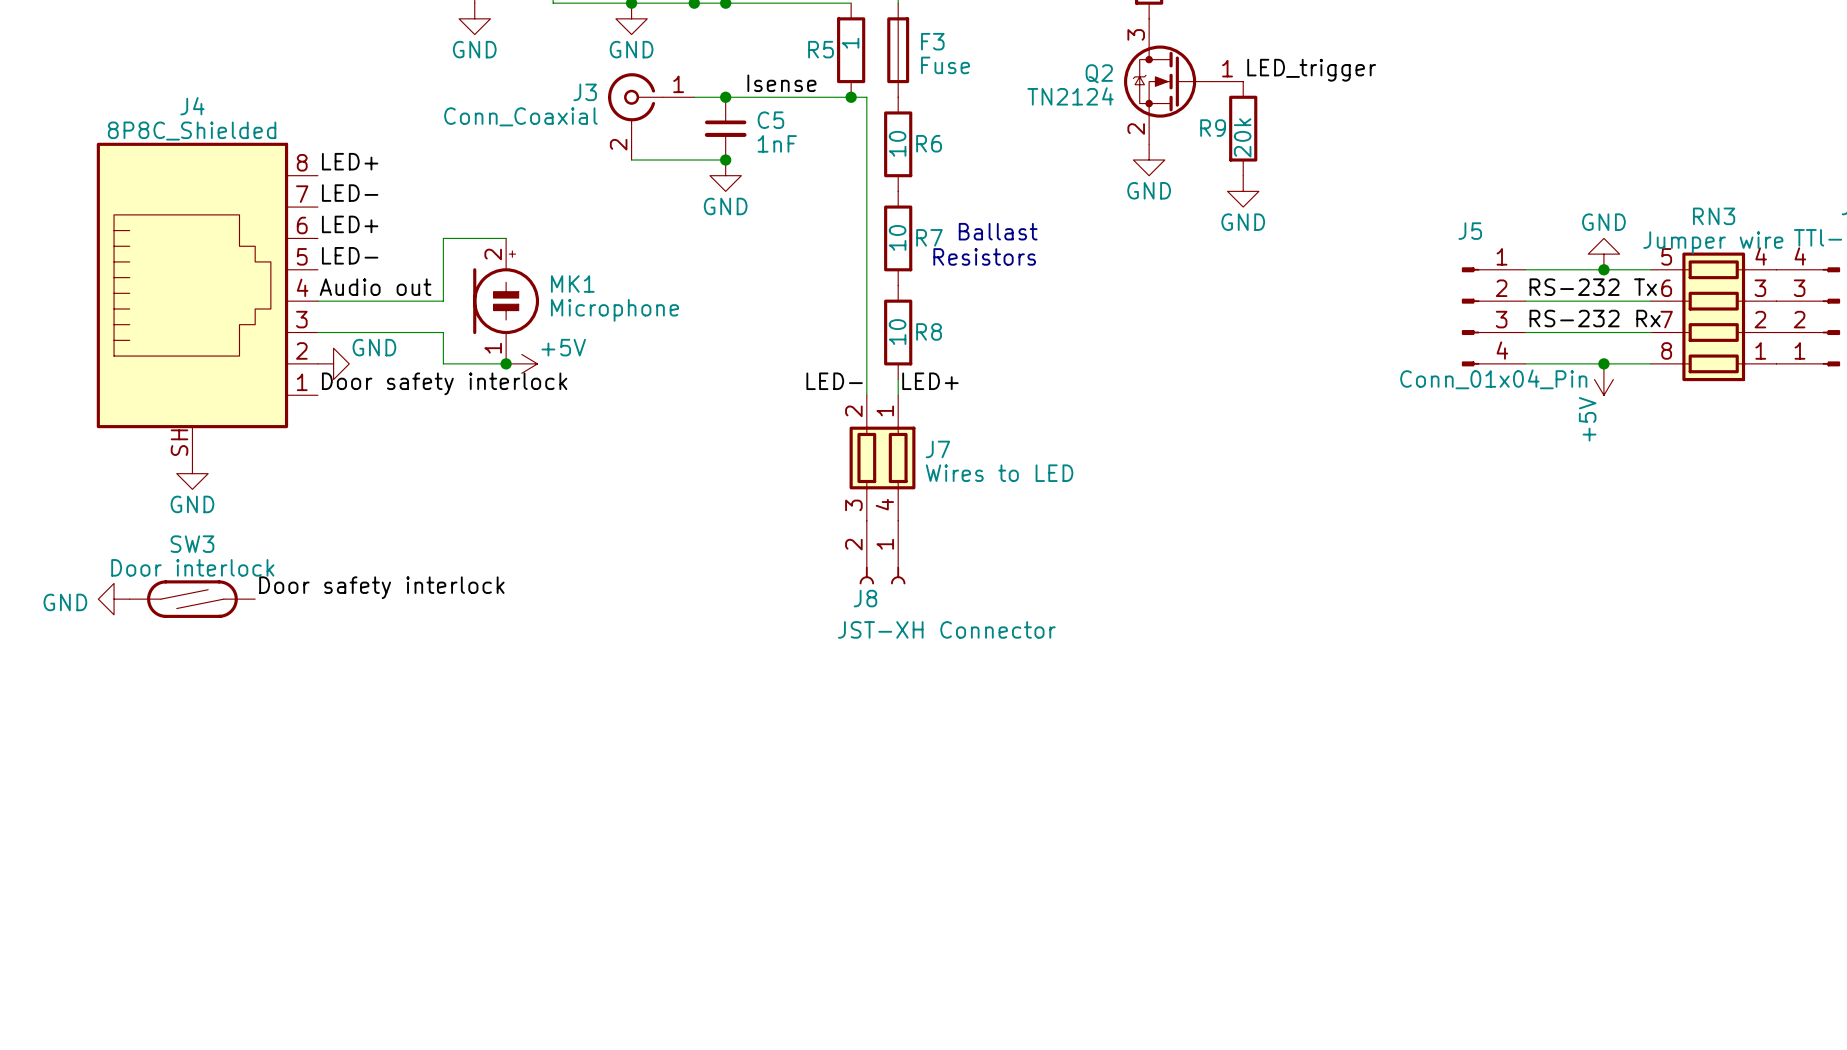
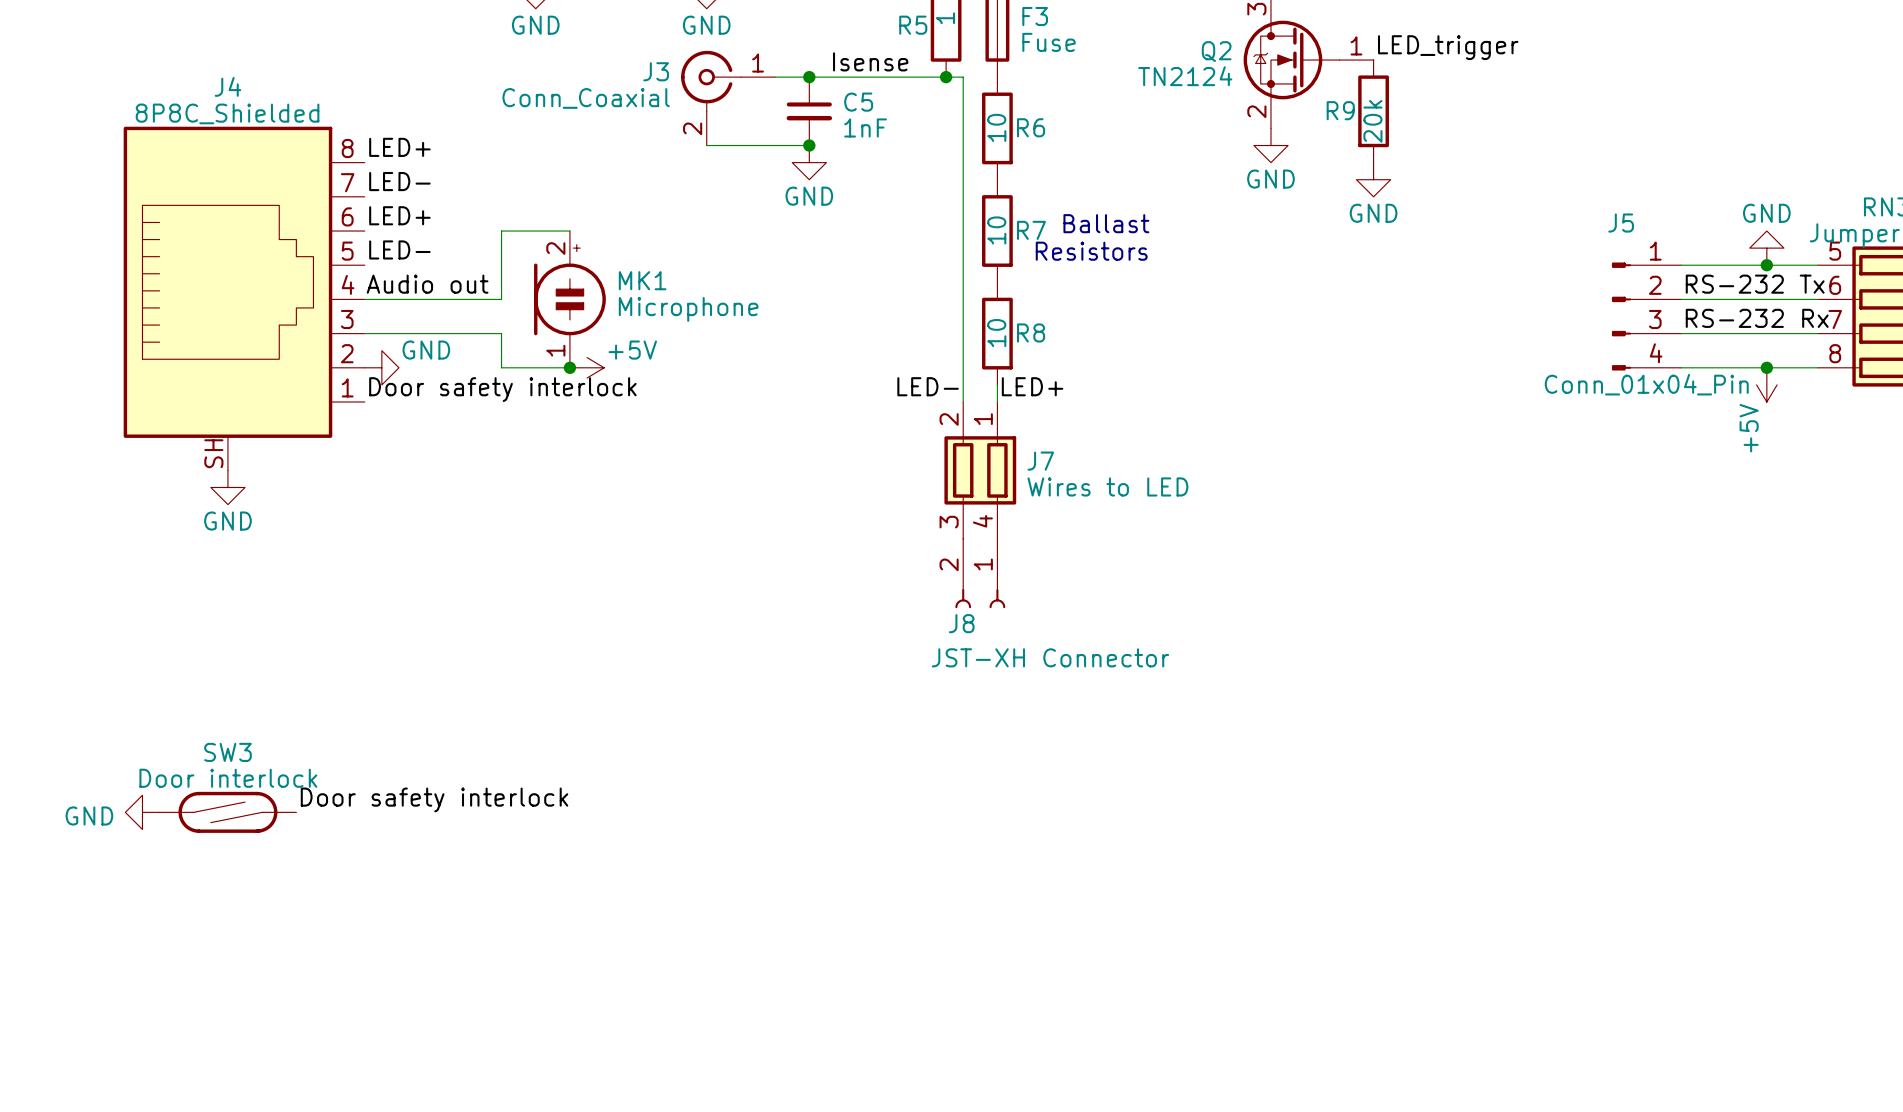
label position: Door safety interlock (381, 587) -> Door safety interlock (434, 799)
power symbol position: GND (114, 599) -> GND (142, 812)
SW3 position: (192, 599) -> (227, 812)

